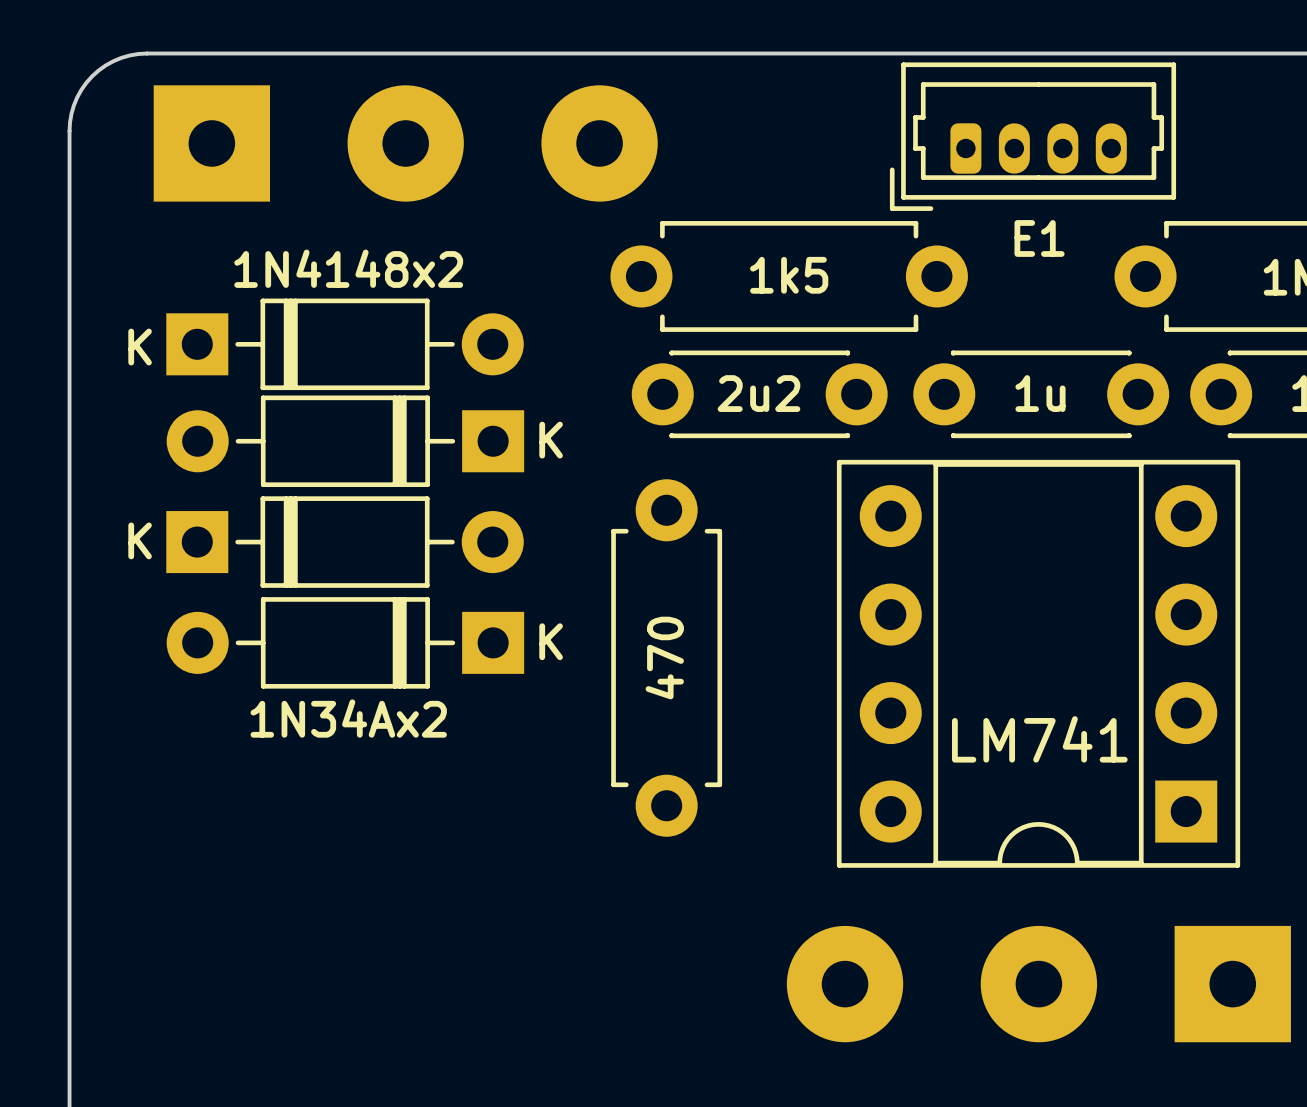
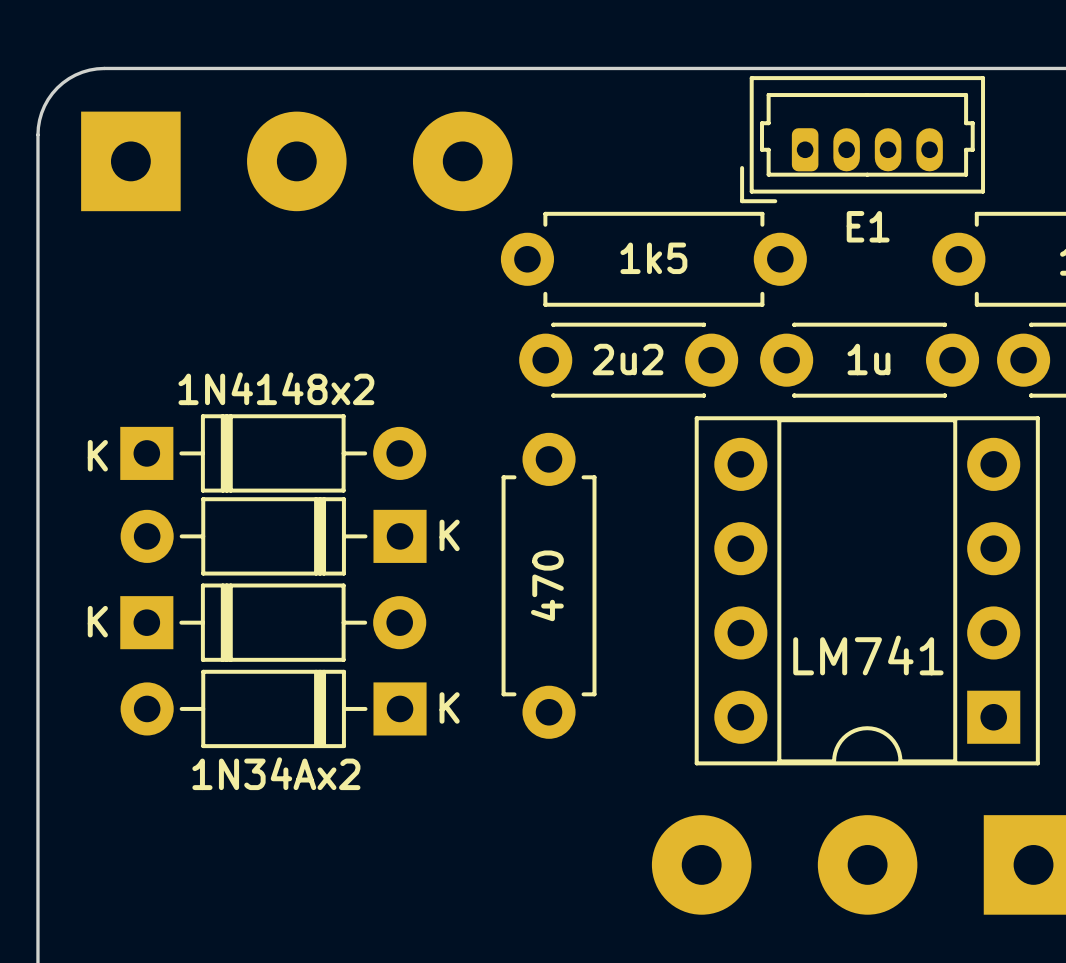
part position: (405, 143) -> (296, 161)
part position: (345, 344) -> (273, 453)
part: (345, 441) -> none
part: (345, 542) -> none
part: none -> (273, 536)
part position: (345, 642) -> (273, 708)
part: none -> (273, 622)

